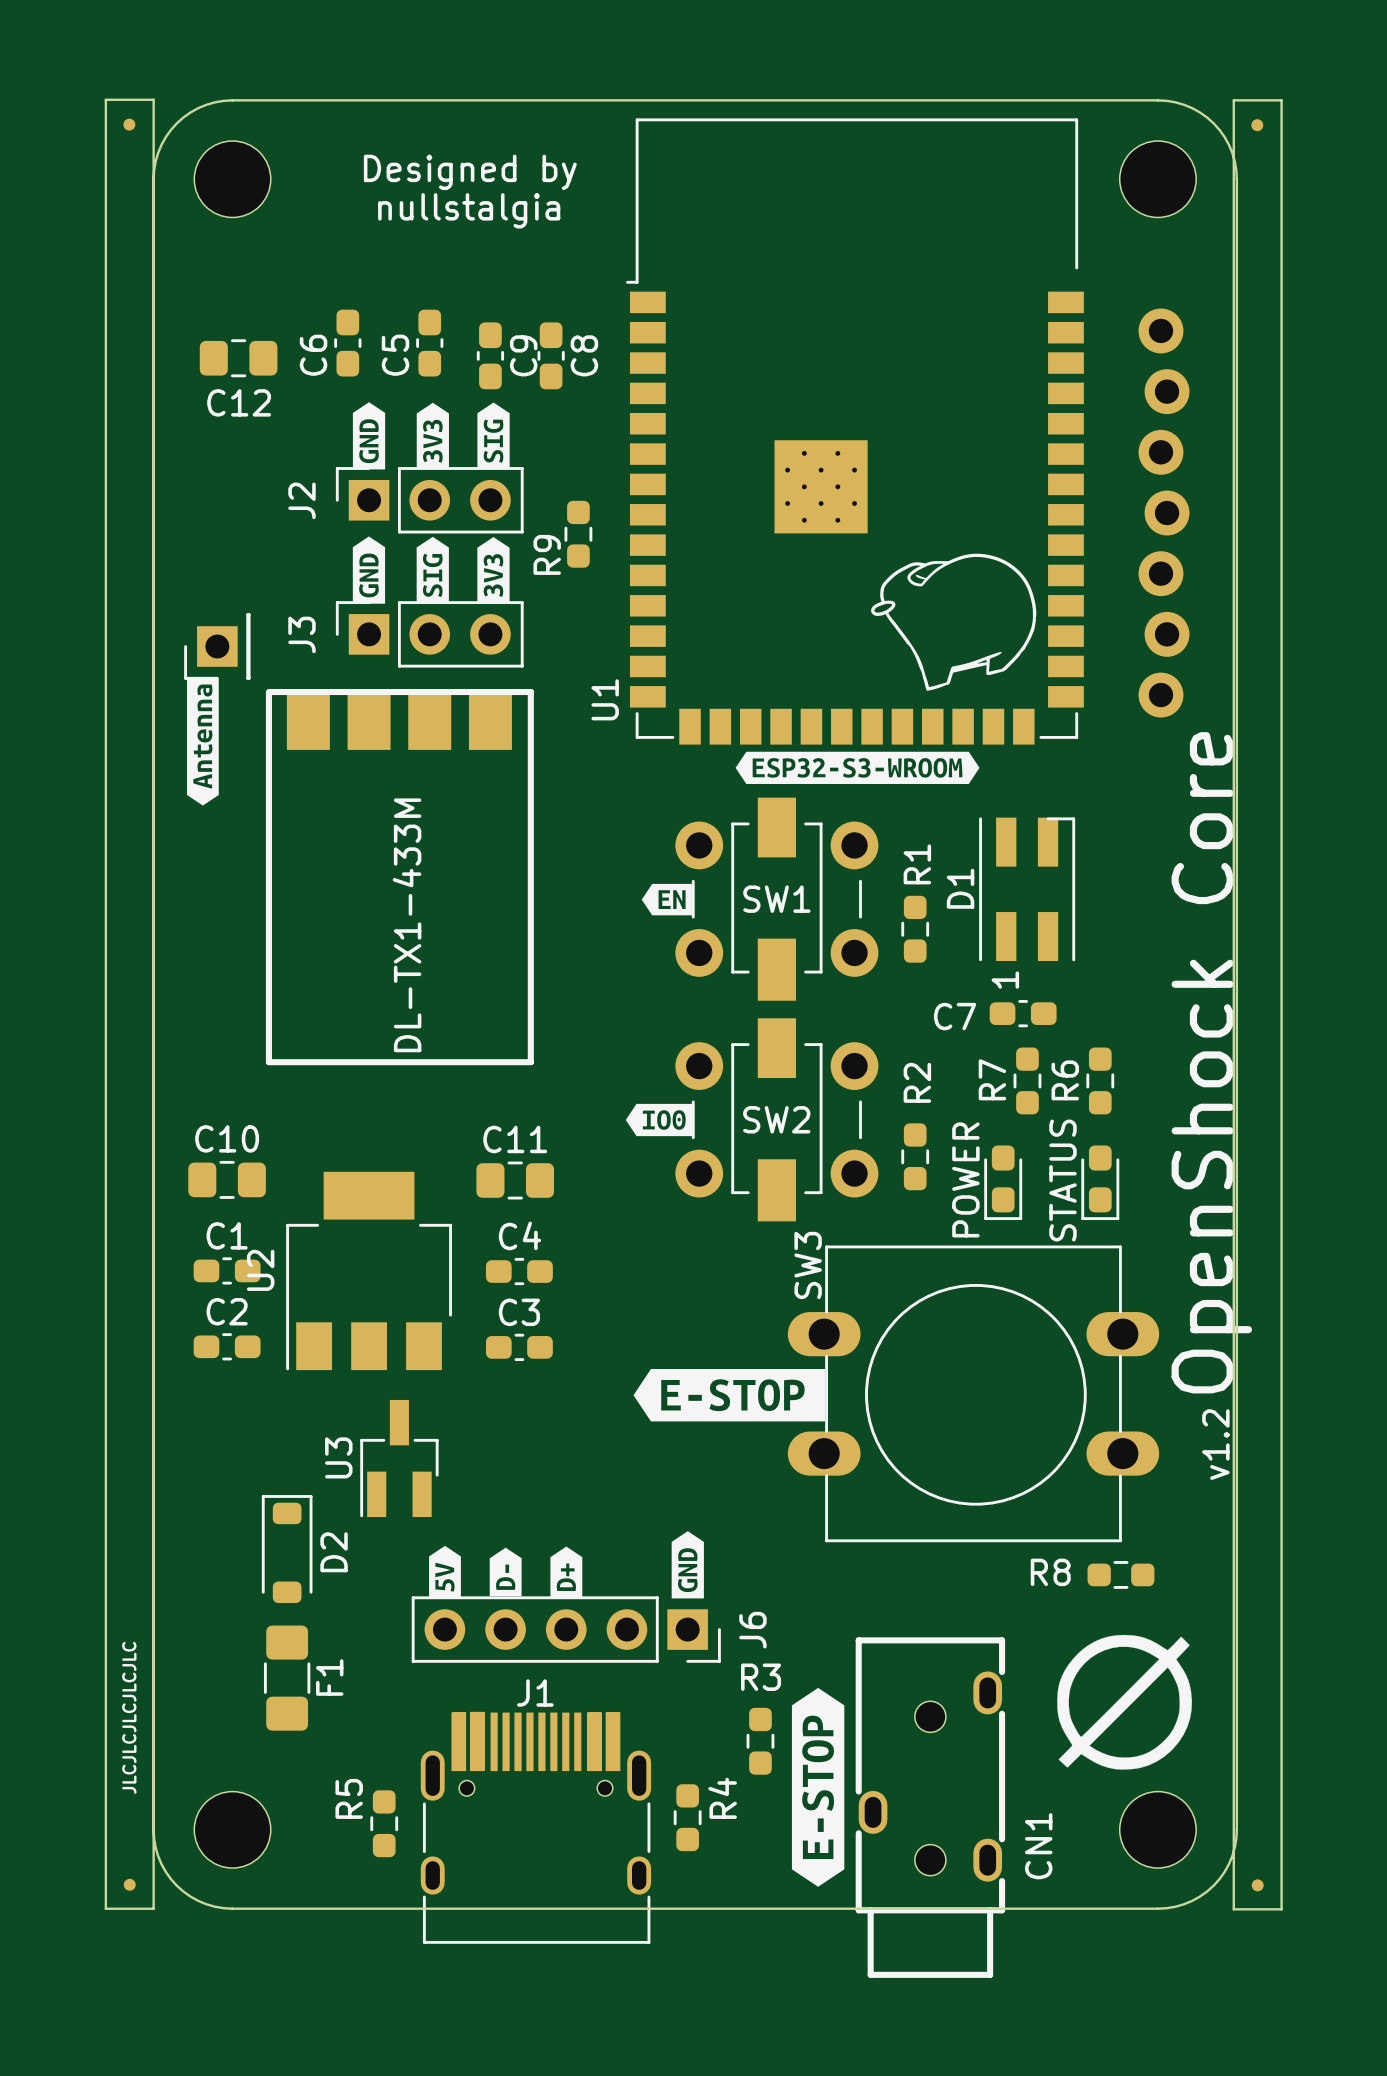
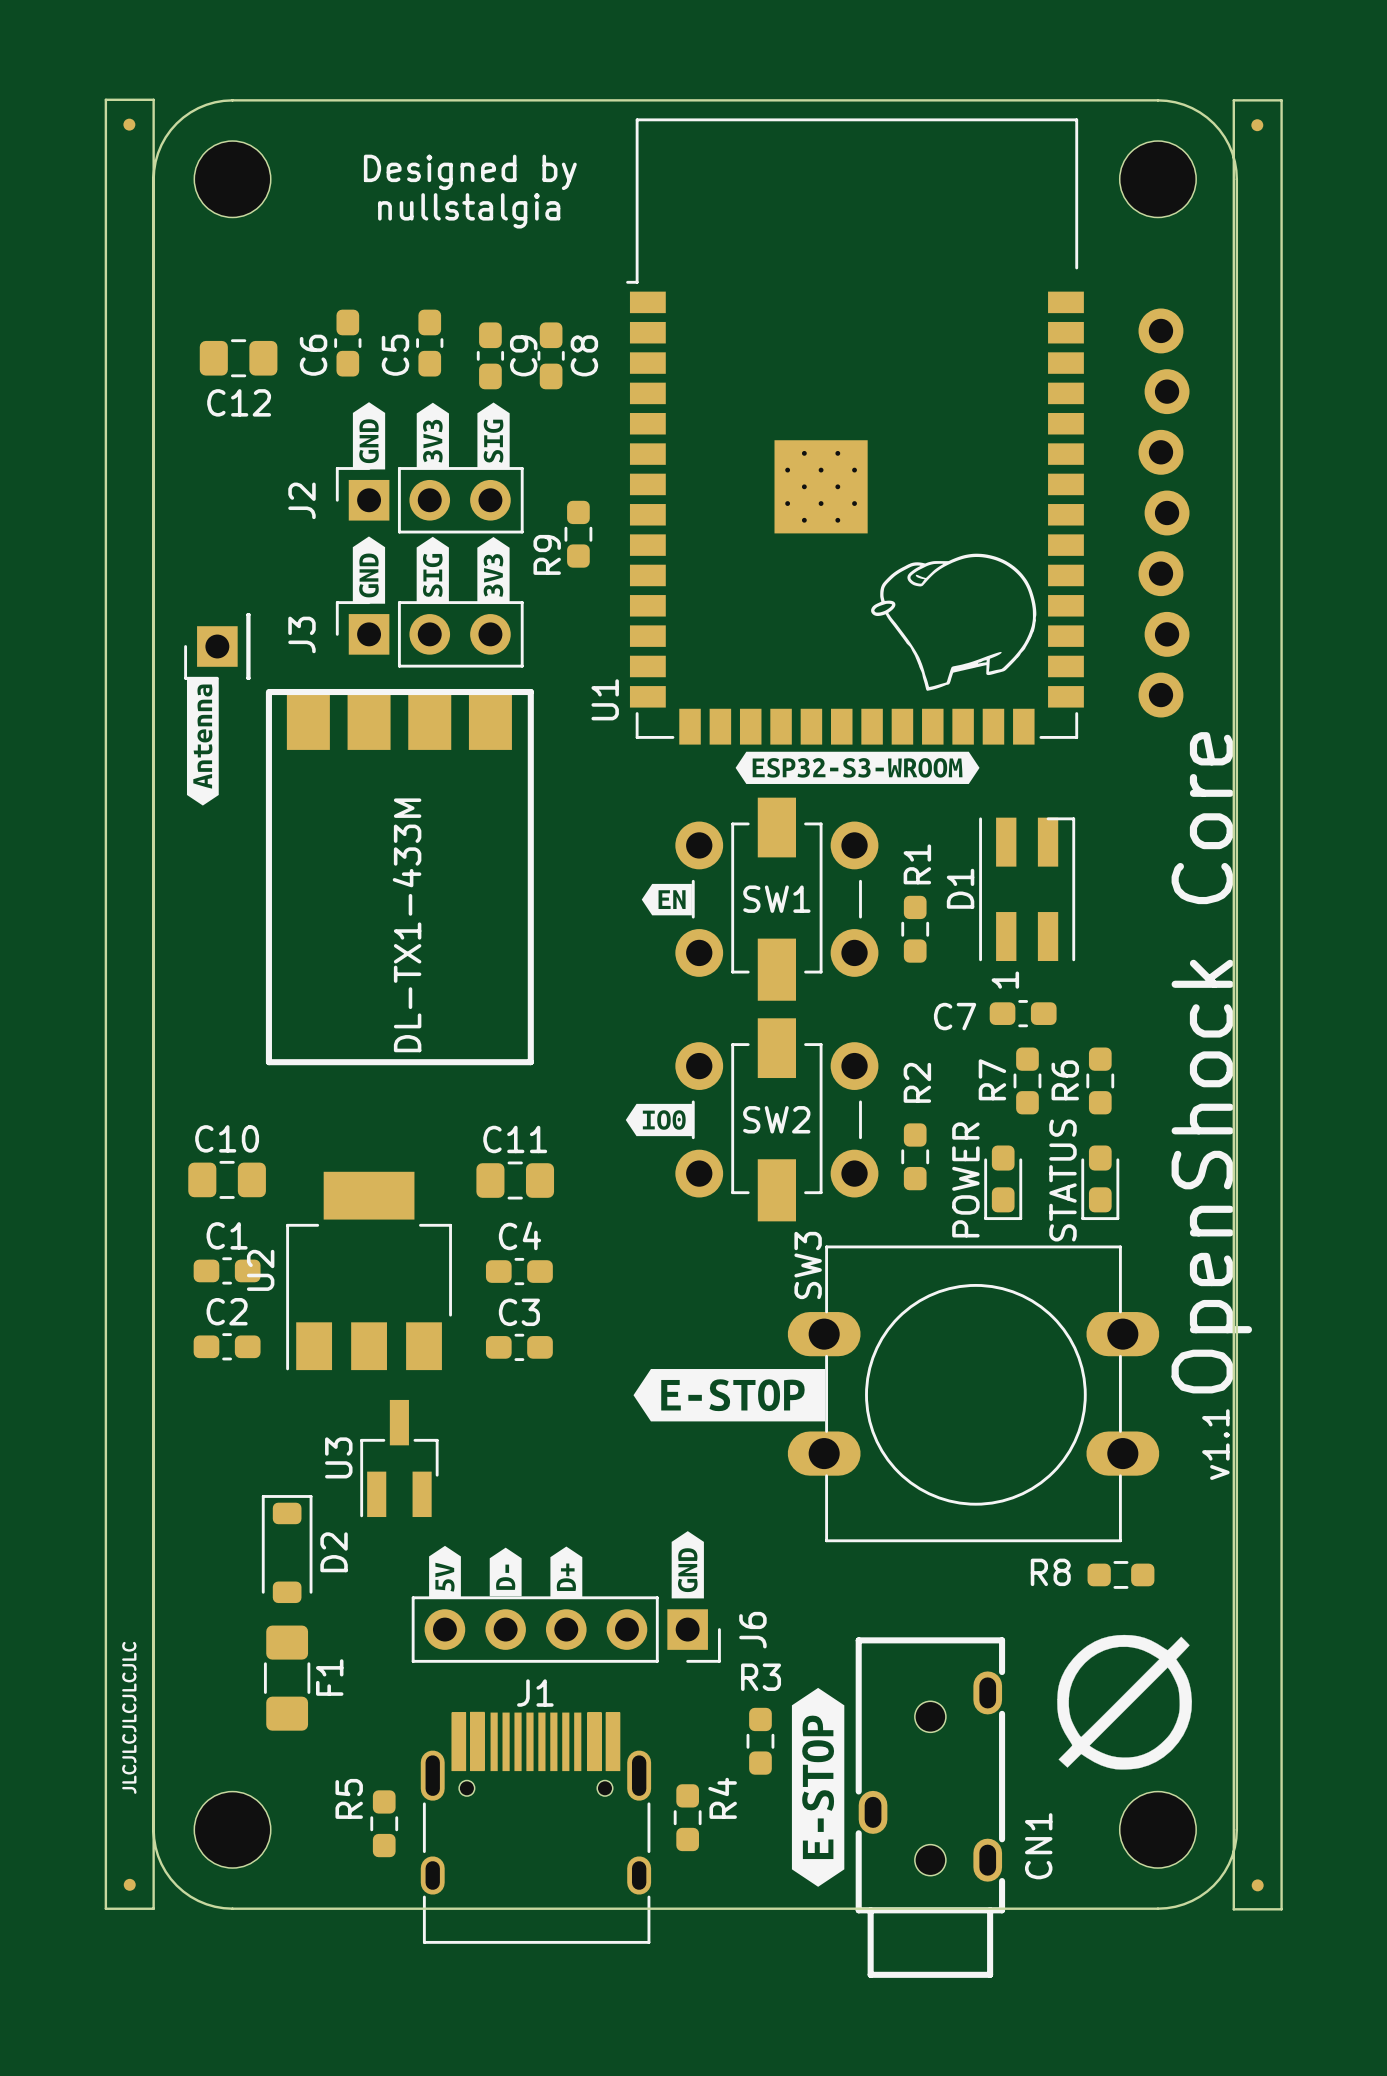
text: v1.2 (1215, 1444) -> v1.1 (1215, 1444)

